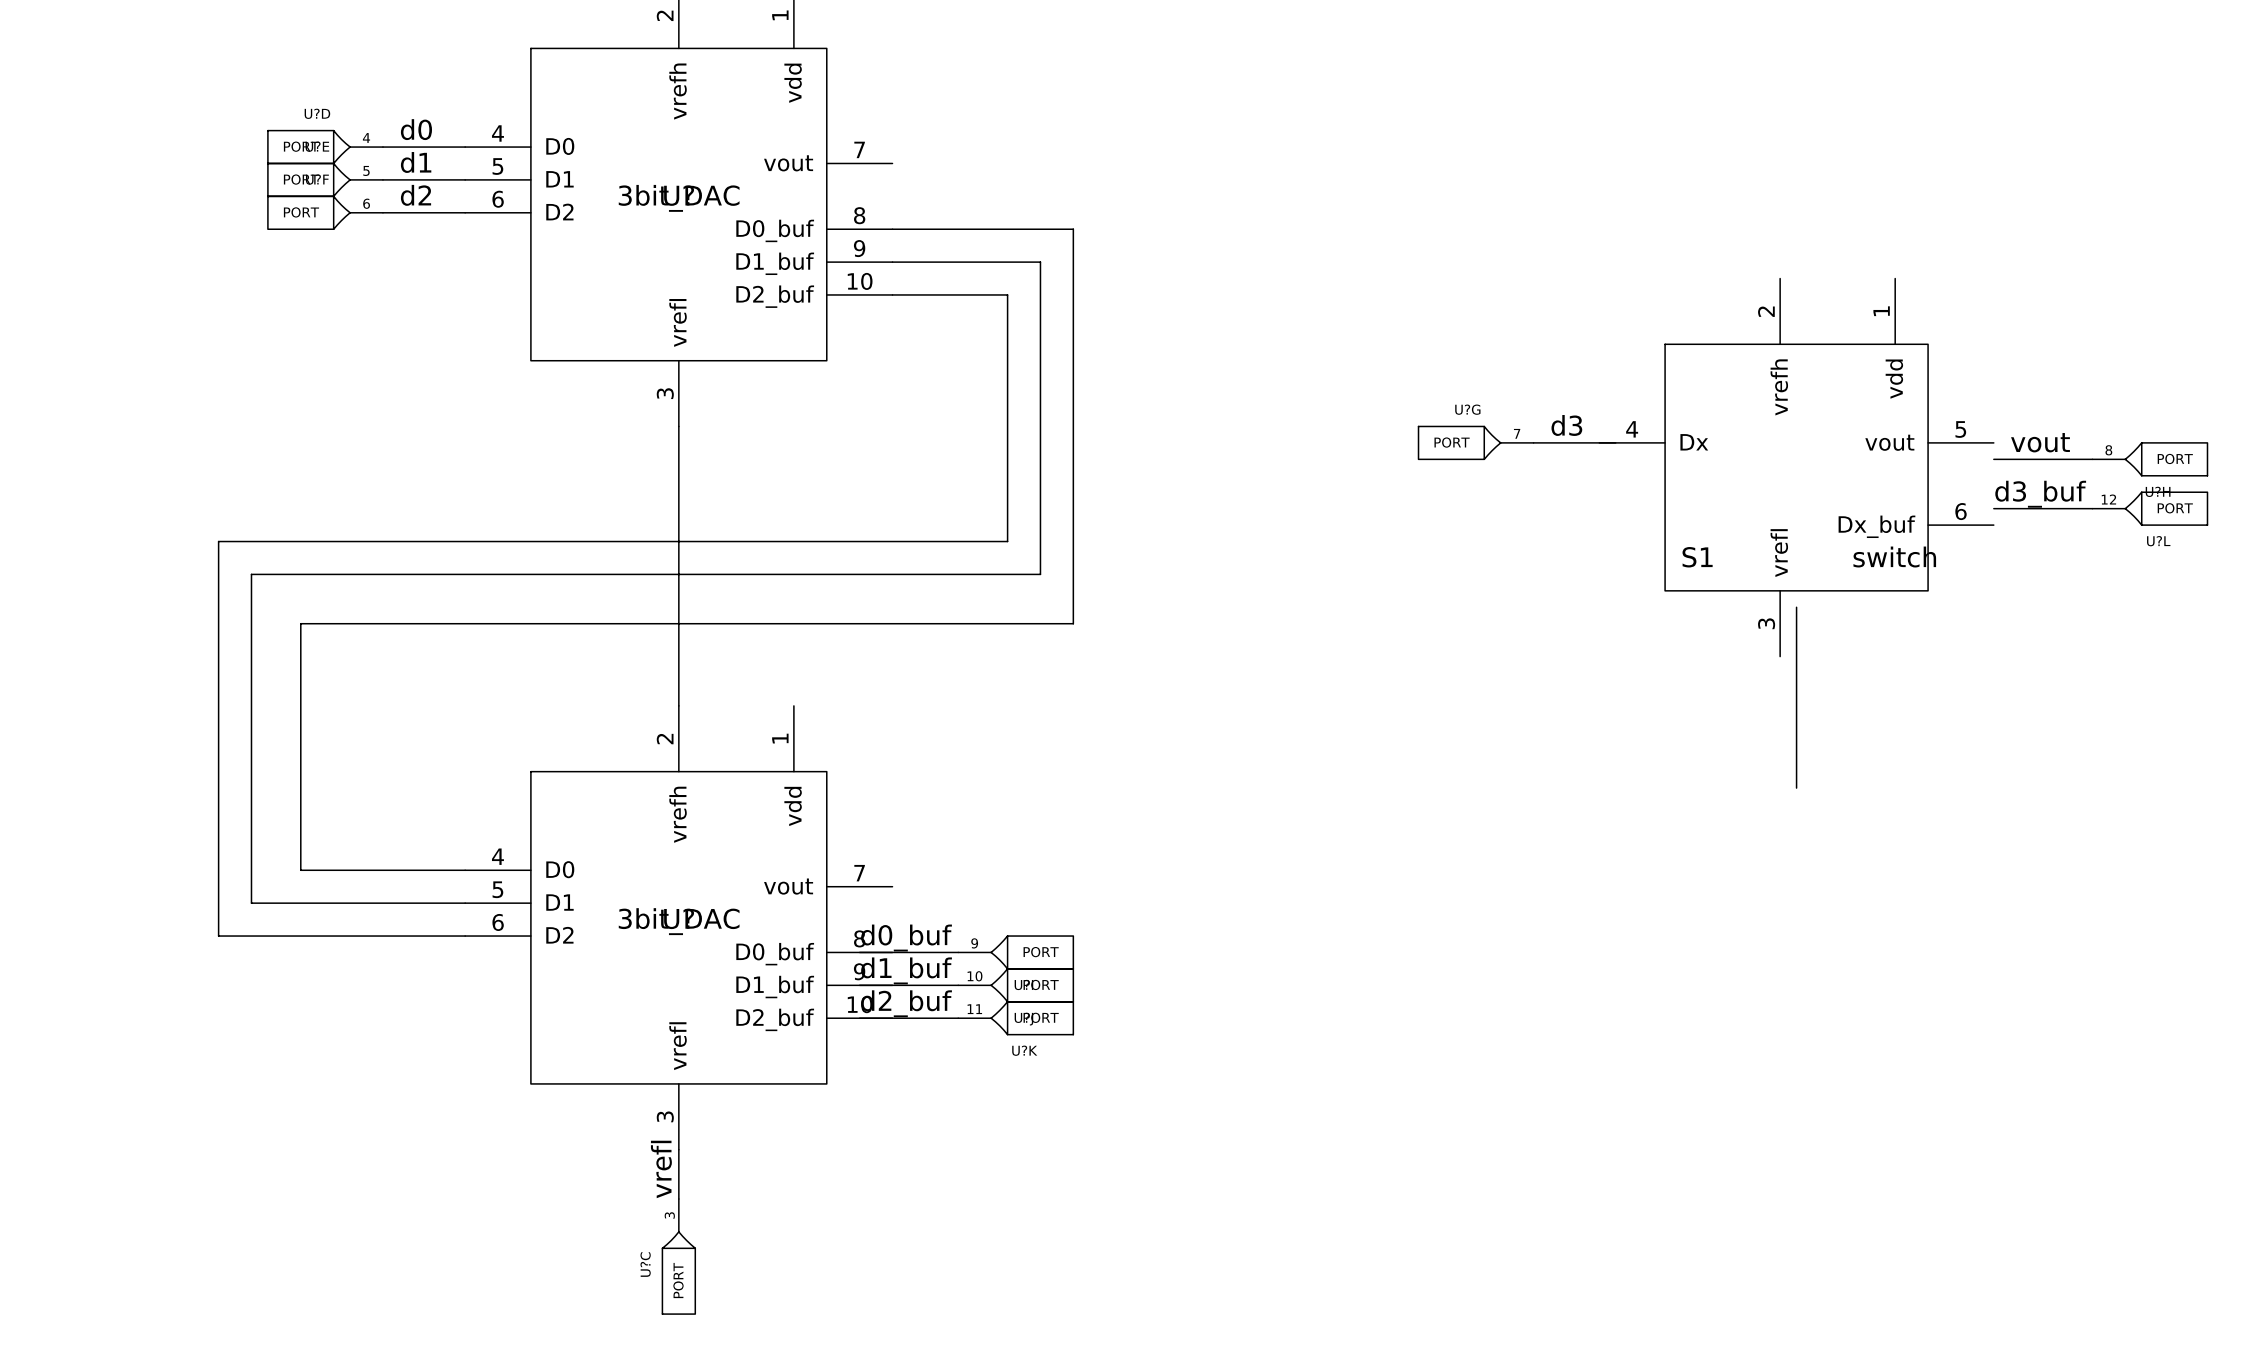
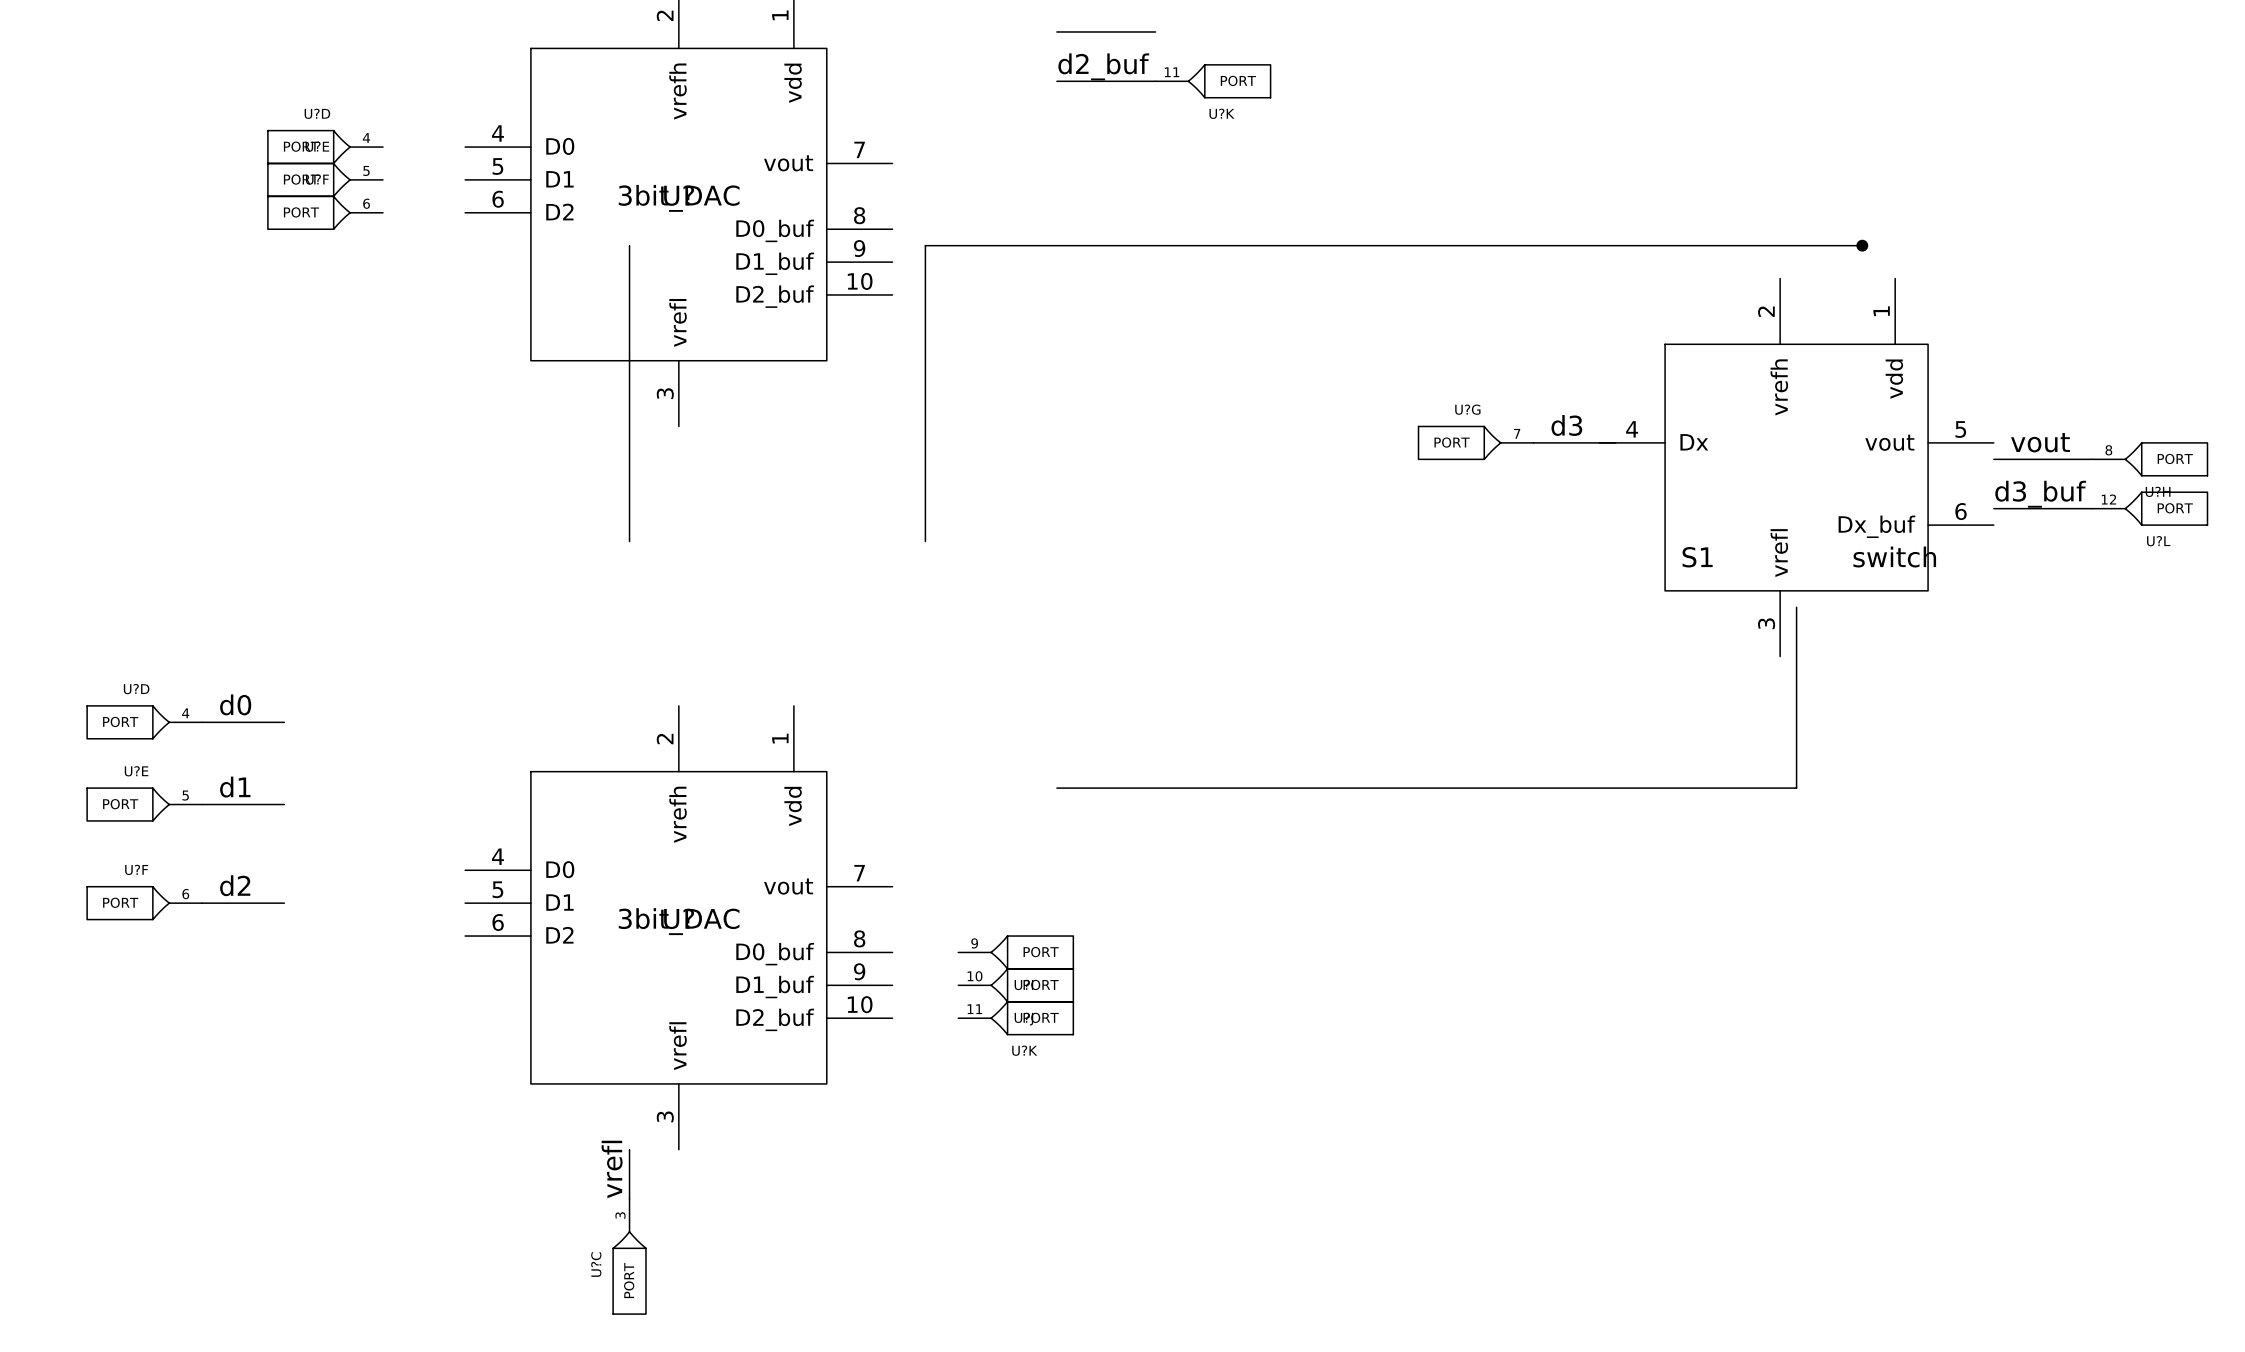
wire: none -> (1056, 31) (1155, 31)
label: none -> d2_buf (1103, 66)
wire: none -> (1056, 81) (1155, 81)
U?K: none -> PORT (1213, 81)
label: d0 (416, 129) -> none
wire: (382, 147) (465, 147) -> none
label: d1 (416, 162) -> none
wire: (382, 179) (465, 179) -> none
label: d2 (416, 195) -> none
wire: (382, 212) (465, 212) -> none
wire: (892, 229) (1073, 229) (1073, 623) (300, 623) (300, 870) (465, 870) -> none
wire: none -> (629, 245) (629, 541)
wire: none -> (1862, 245) (925, 245) (925, 541)
junction: none -> (1862, 245)
wire: (892, 262) (1040, 262) (1040, 574) (251, 574) (251, 903) -> (202, 903) (251, 903)
wire: (892, 294) (1007, 294) (1007, 541) (218, 541) (218, 936) (465, 936) -> none
wire: (678, 426) (678, 705) -> none
label: none -> d0 (235, 704)
U?D: none -> PORT (144, 722)
wire: none -> (202, 722) (284, 722)
label: none -> d1 (235, 787)
wire: none -> (1056, 788) (1796, 788)
U?E: none -> PORT (144, 804)
wire: none -> (202, 804) (284, 804)
label: none -> d2 (235, 885)
U?F: none -> PORT (144, 903)
wire: (284, 903) (465, 903) -> none
label: d0_buf (906, 938) -> none
wire: (859, 952) (958, 952) -> none
label: d1_buf (906, 970) -> none
wire: (859, 985) (958, 985) -> none
label: d2_buf (906, 1003) -> none
wire: (859, 1018) (958, 1018) -> none
wire: (678, 1149) (678, 1199) -> (629, 1149) (629, 1199)
label position: vrefl (661, 1169) -> vrefl (612, 1169)
U?C position: (678, 1256) -> (629, 1256)

